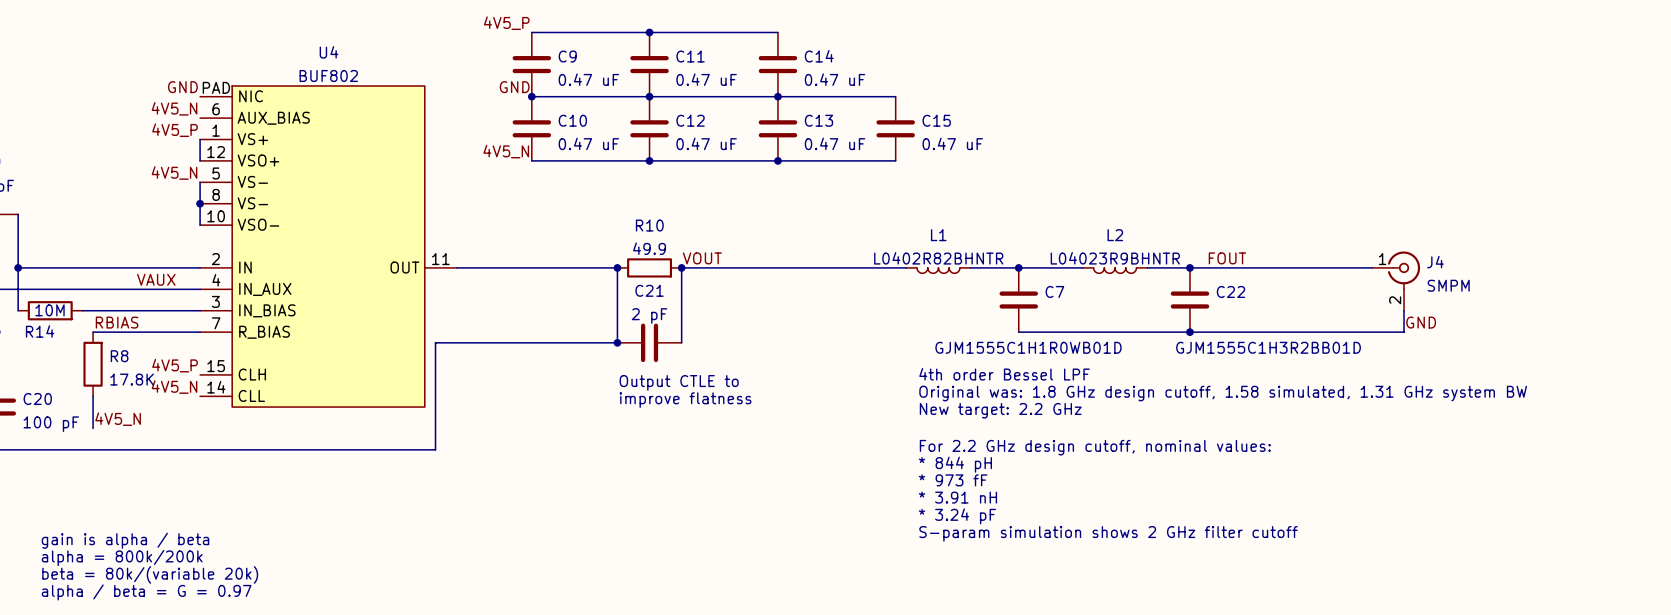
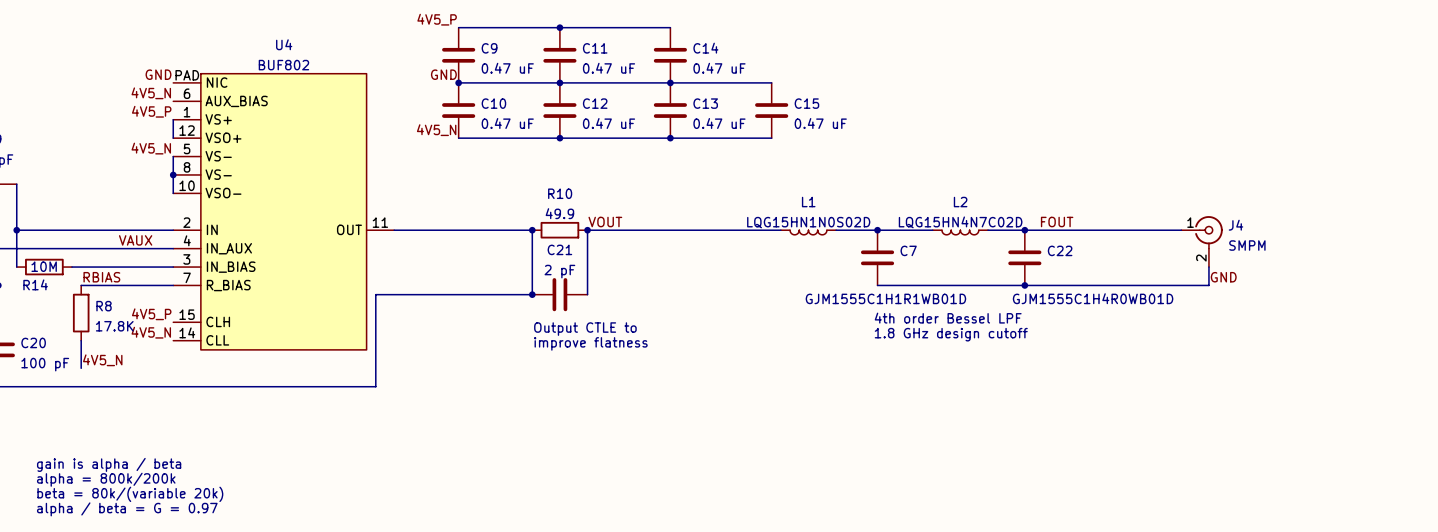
L1 value: L0402R82BHNTR (938, 258) -> LQG15HN1N0S02D (808, 222)
L2 value: L04023R9BHNTR (1115, 258) -> LQG15HN4N7C02D (960, 222)
C7 value: GJM1555C1H1R0WB01D (1028, 347) -> GJM1555C1H1R1WB01D (885, 298)
C22 value: GJM1555C1H3R2BB01D (1268, 347) -> GJM1555C1H4R0WB01D (1093, 298)
text position: 4th order Bessel LPF (1004, 374) -> 4th order Bessel LPF (948, 318)
text: none -> 1.8 GHz design cutoff (951, 334)
text: Original was: 1.8 GHz design cutoff, 1.58 simulated, 1.31 GHz system BW (1223, 393) -> none
text: New target: 2.2 GHz (1000, 410) -> none
text: For 2.2 GHz design cutoff, nominal values: (1095, 447) -> none
text: * 844 pH (955, 464) -> none
text: * 973 fF (953, 480) -> none
text: * 3.91 nH (957, 497) -> none
text: * 3.24 pF (957, 516) -> none
text: S-param simulation shows 2 GHz filter cutoff (1108, 533) -> none

